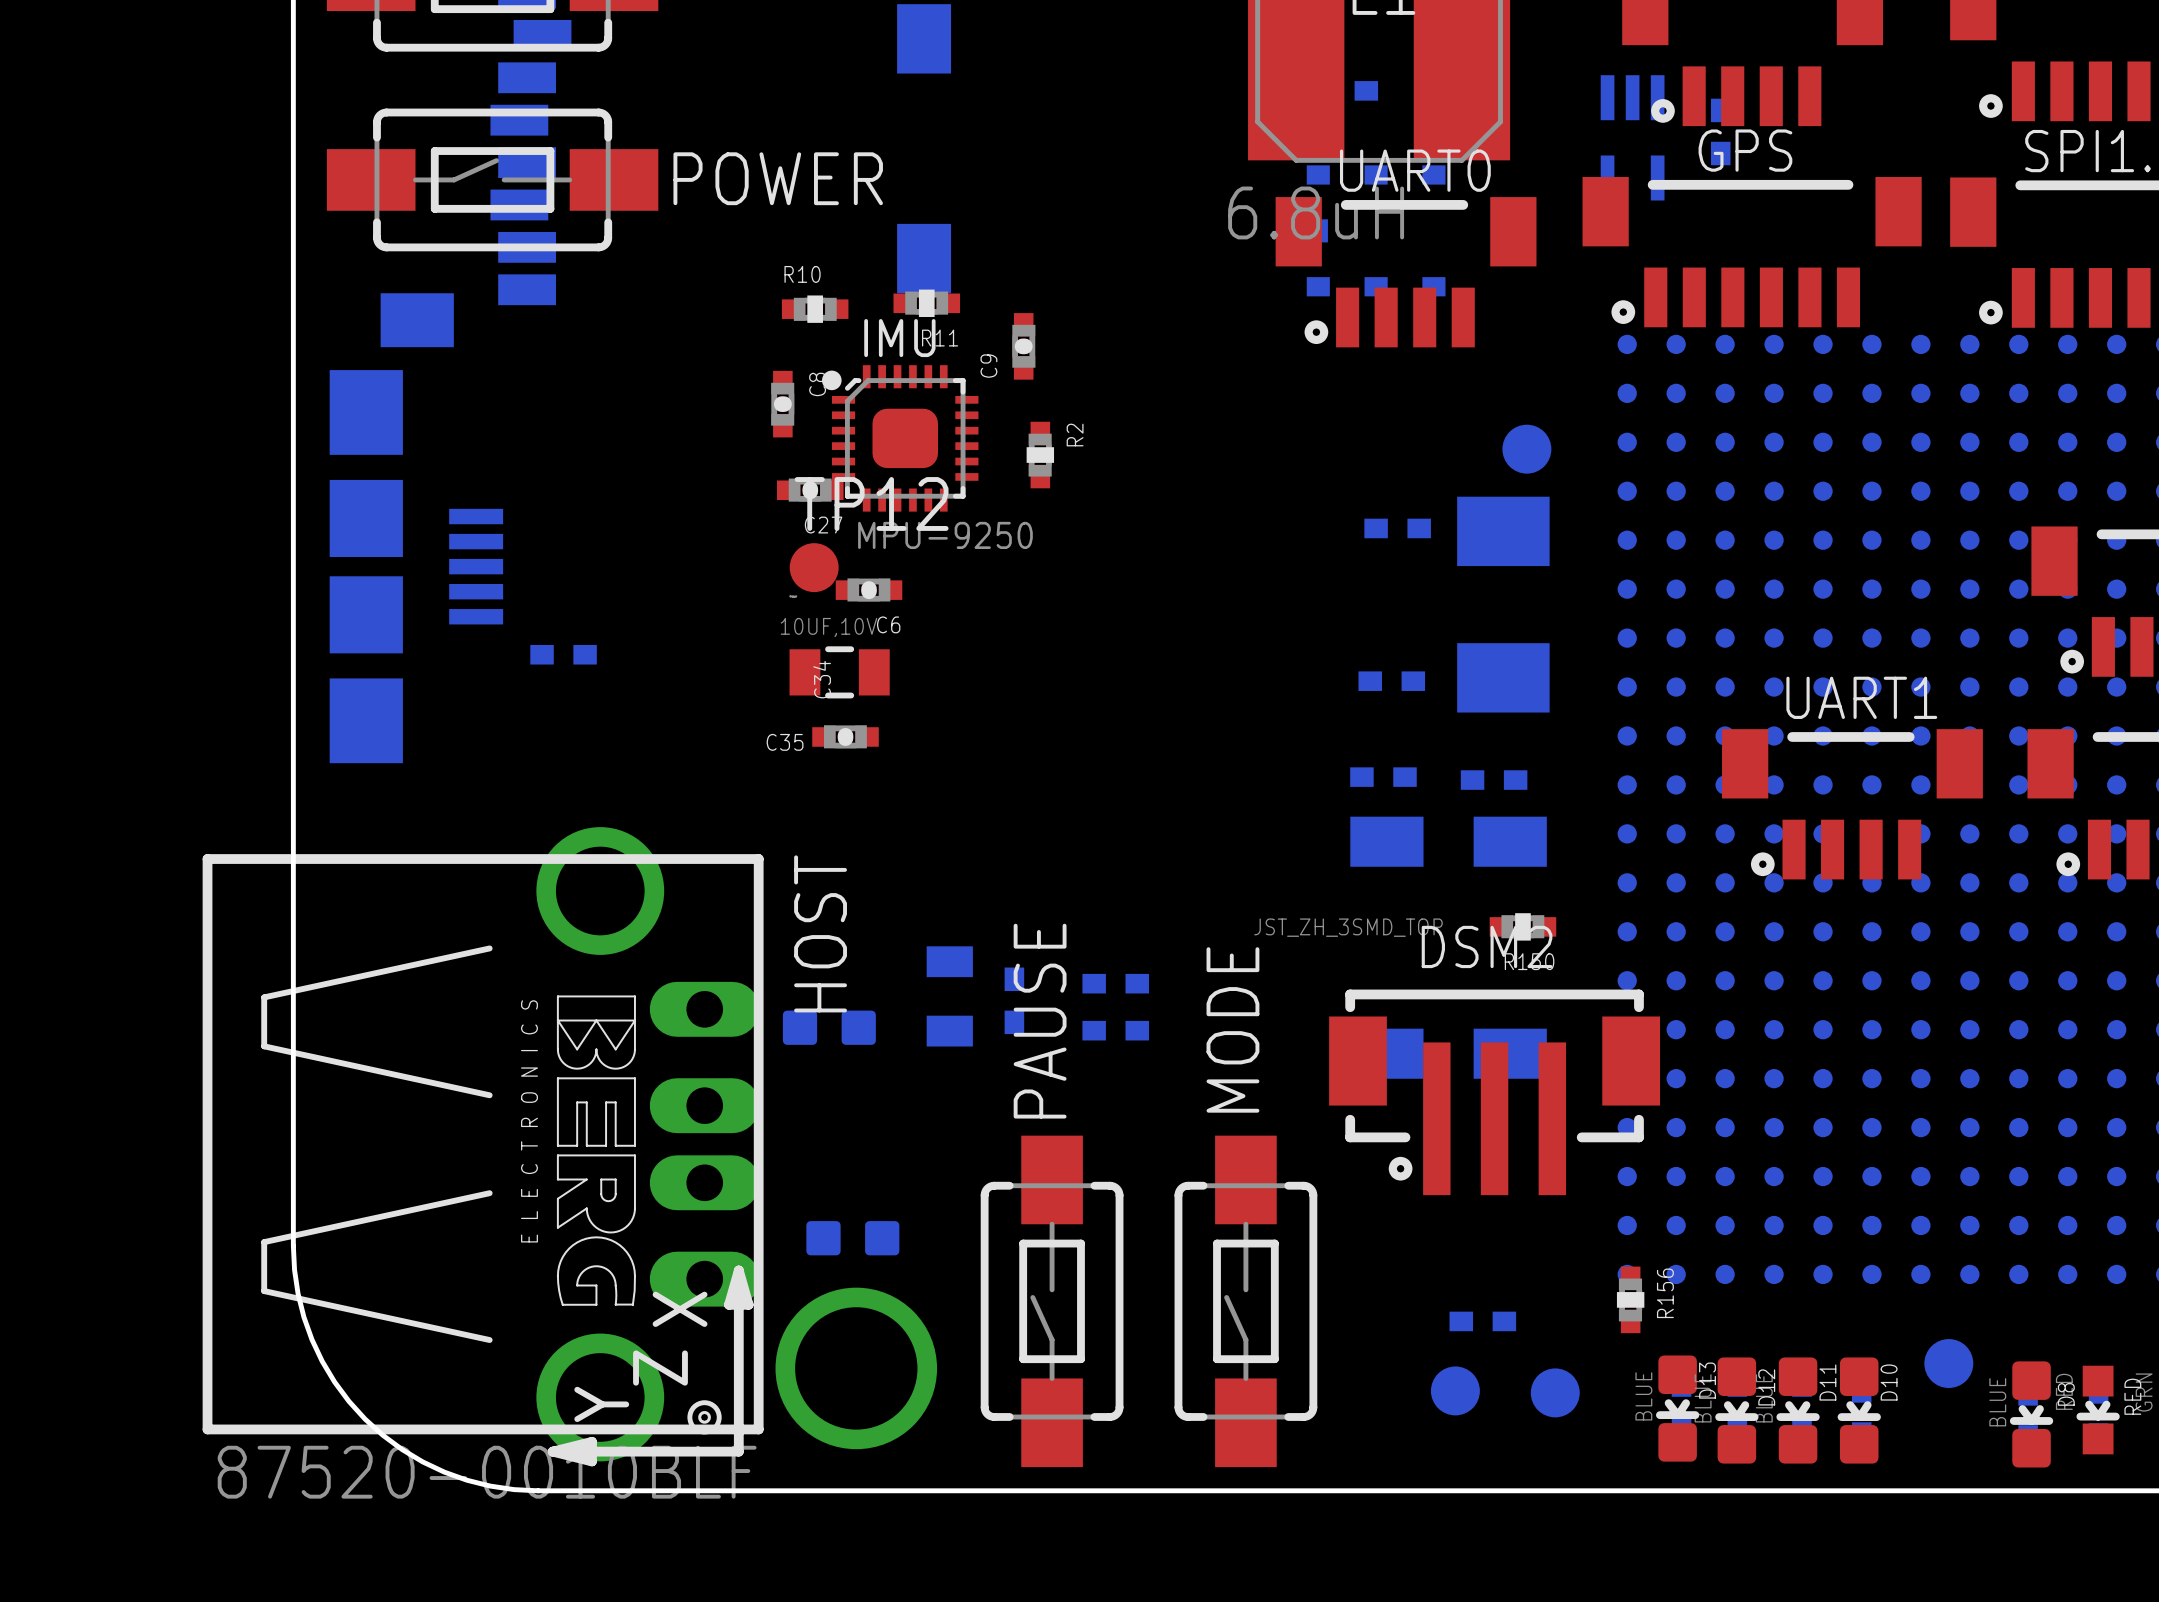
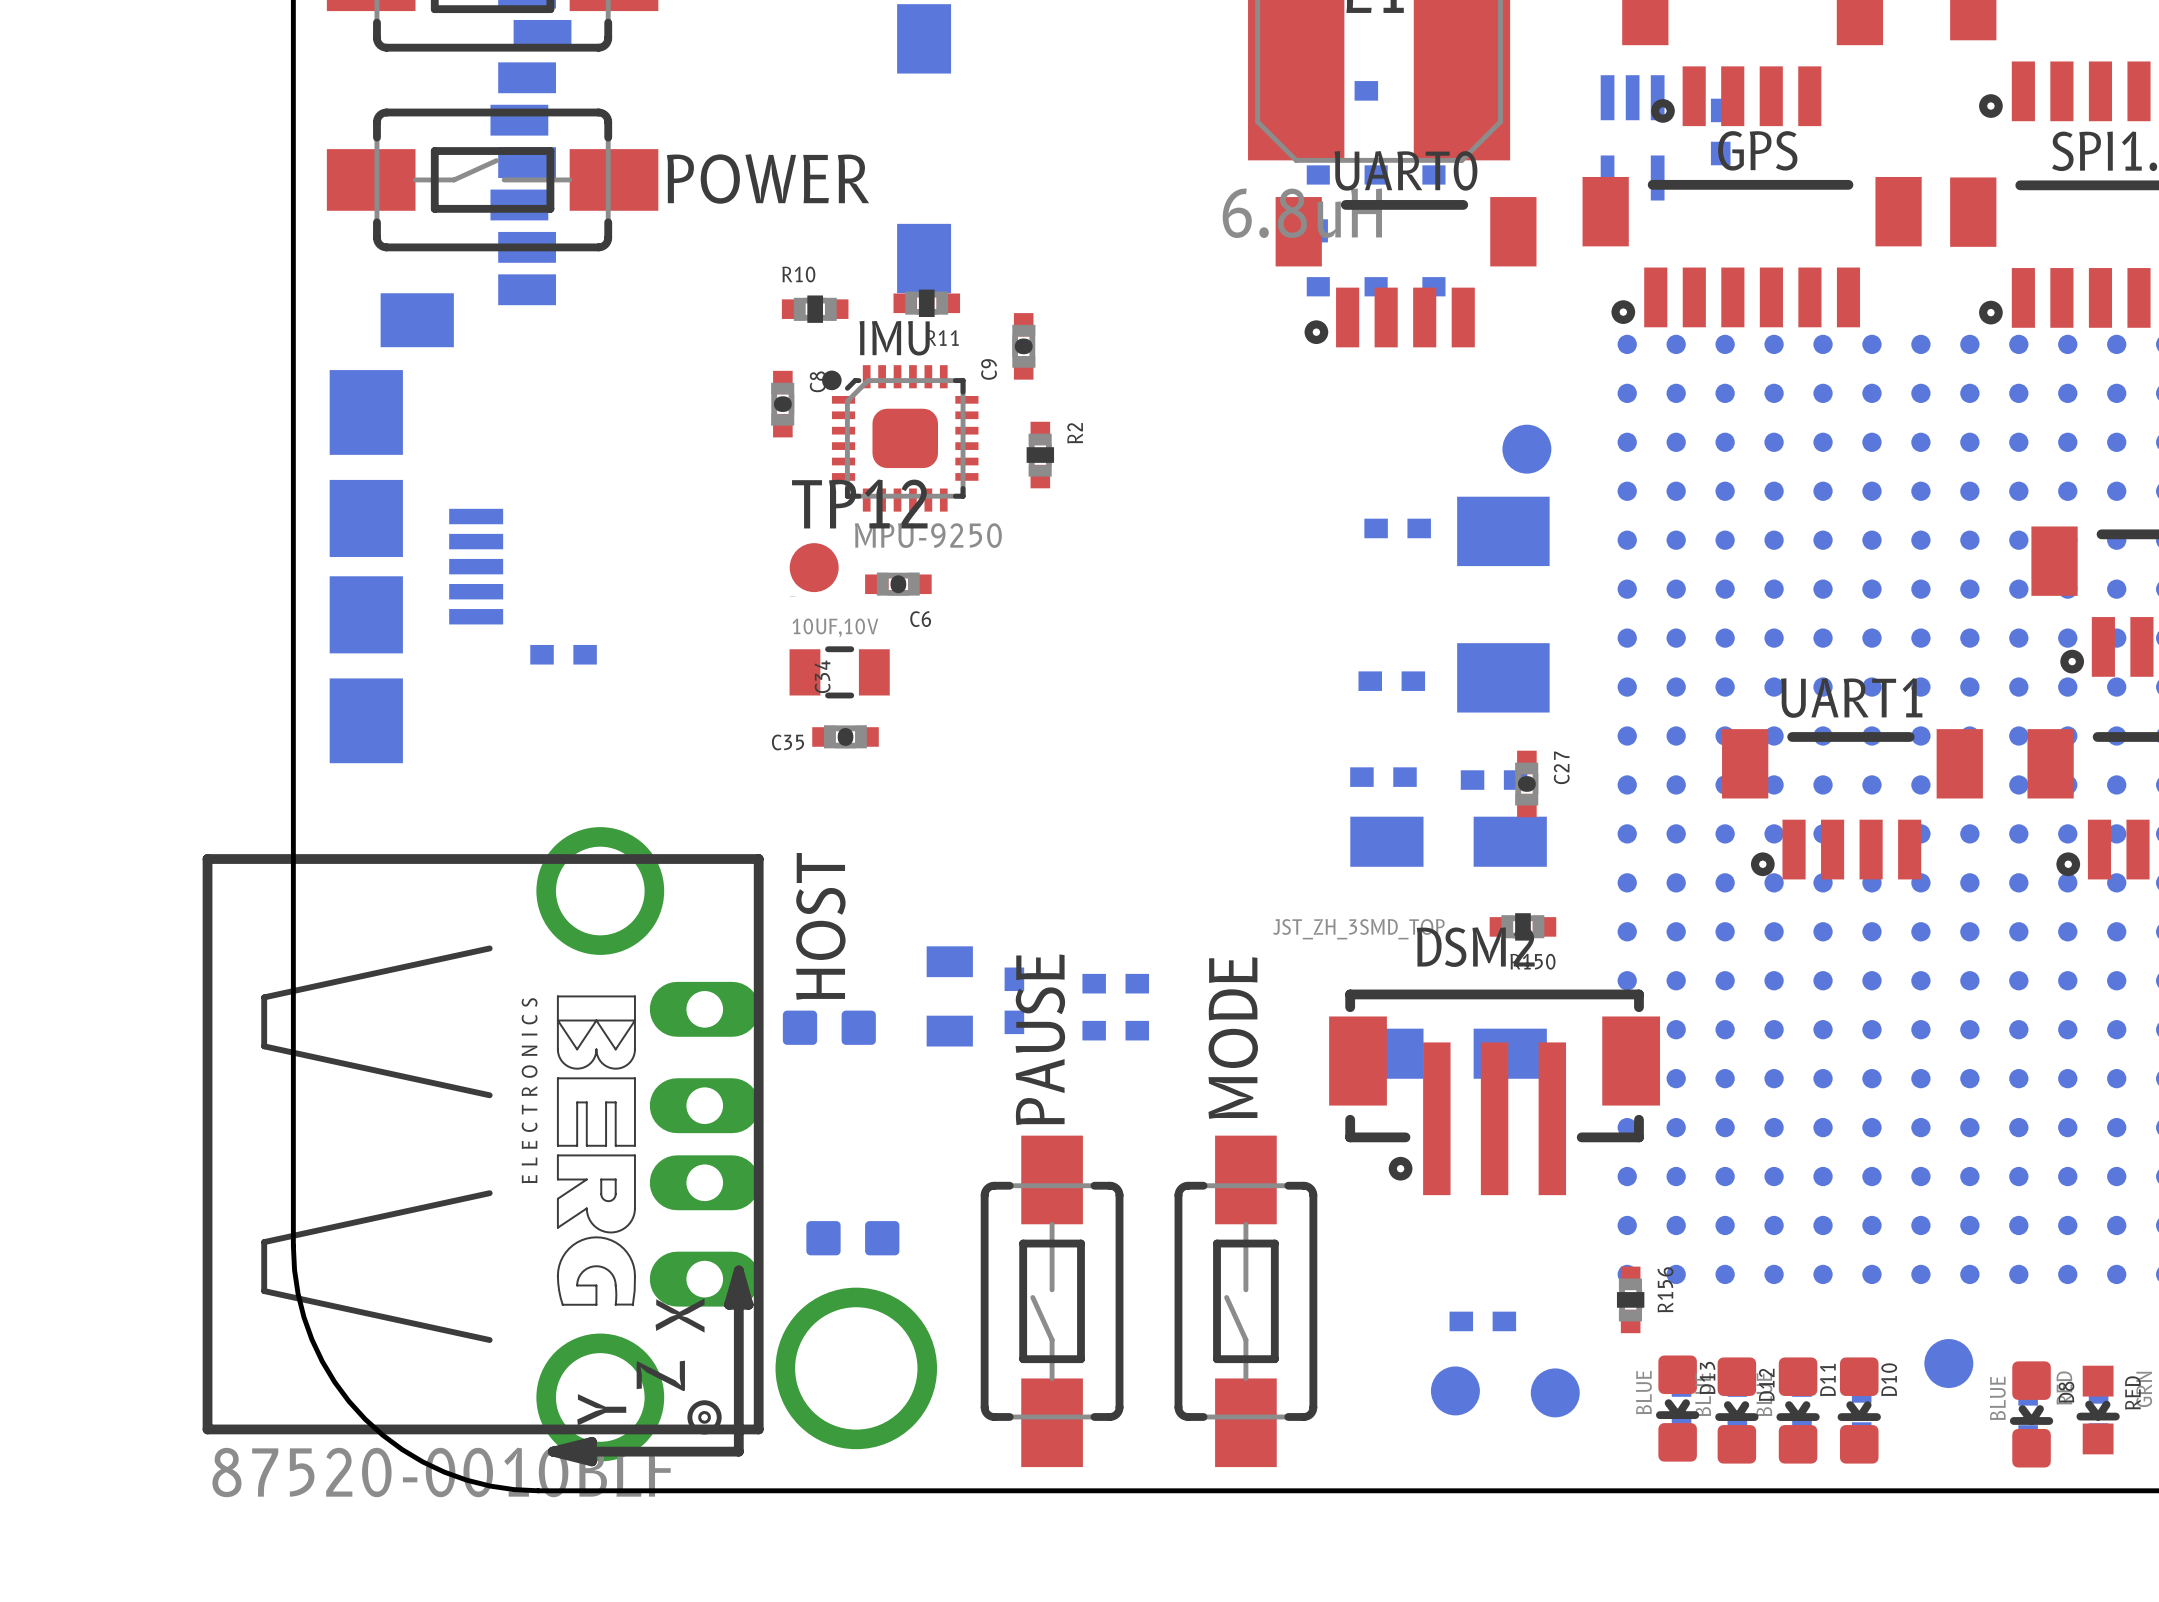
C27 rotation: 0° (810, 490) -> 90° clockwise (1526, 783)
C27 position: (810, 490) -> (1526, 783)
C6 position: (869, 590) -> (898, 584)

